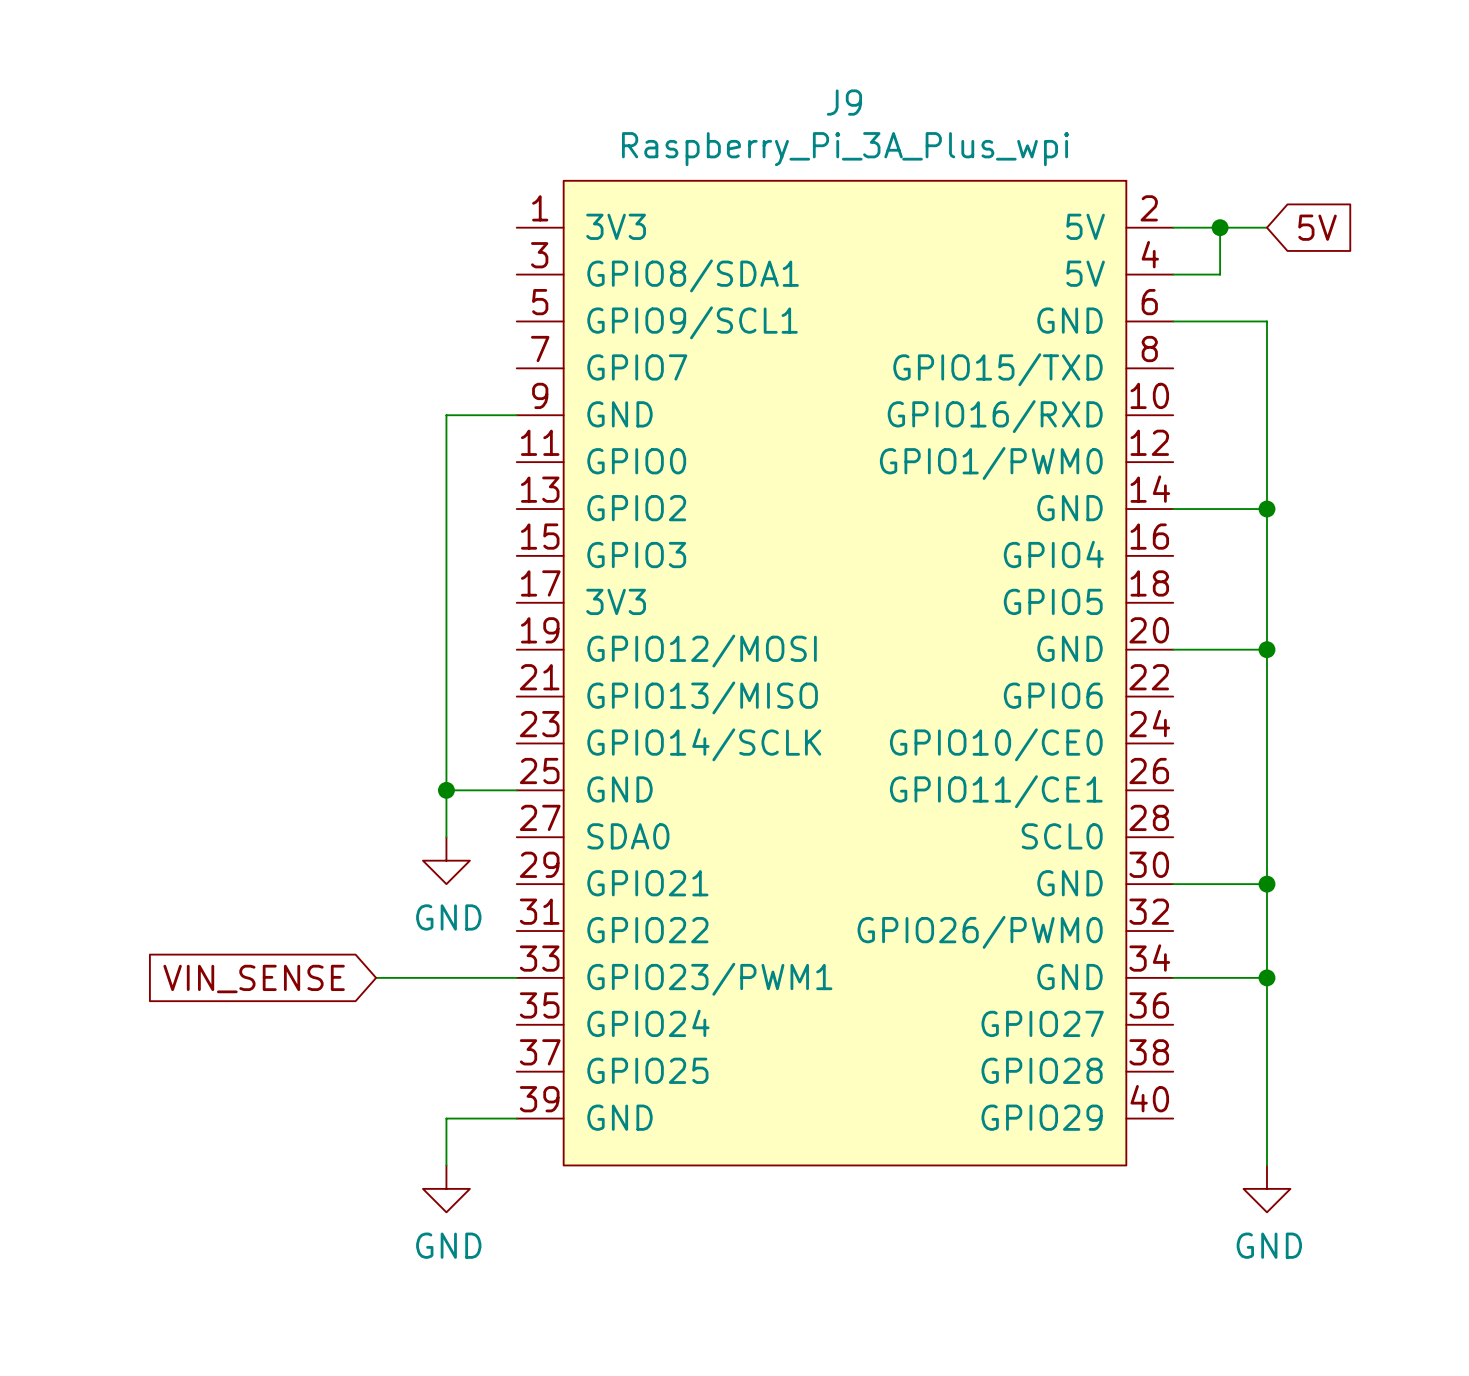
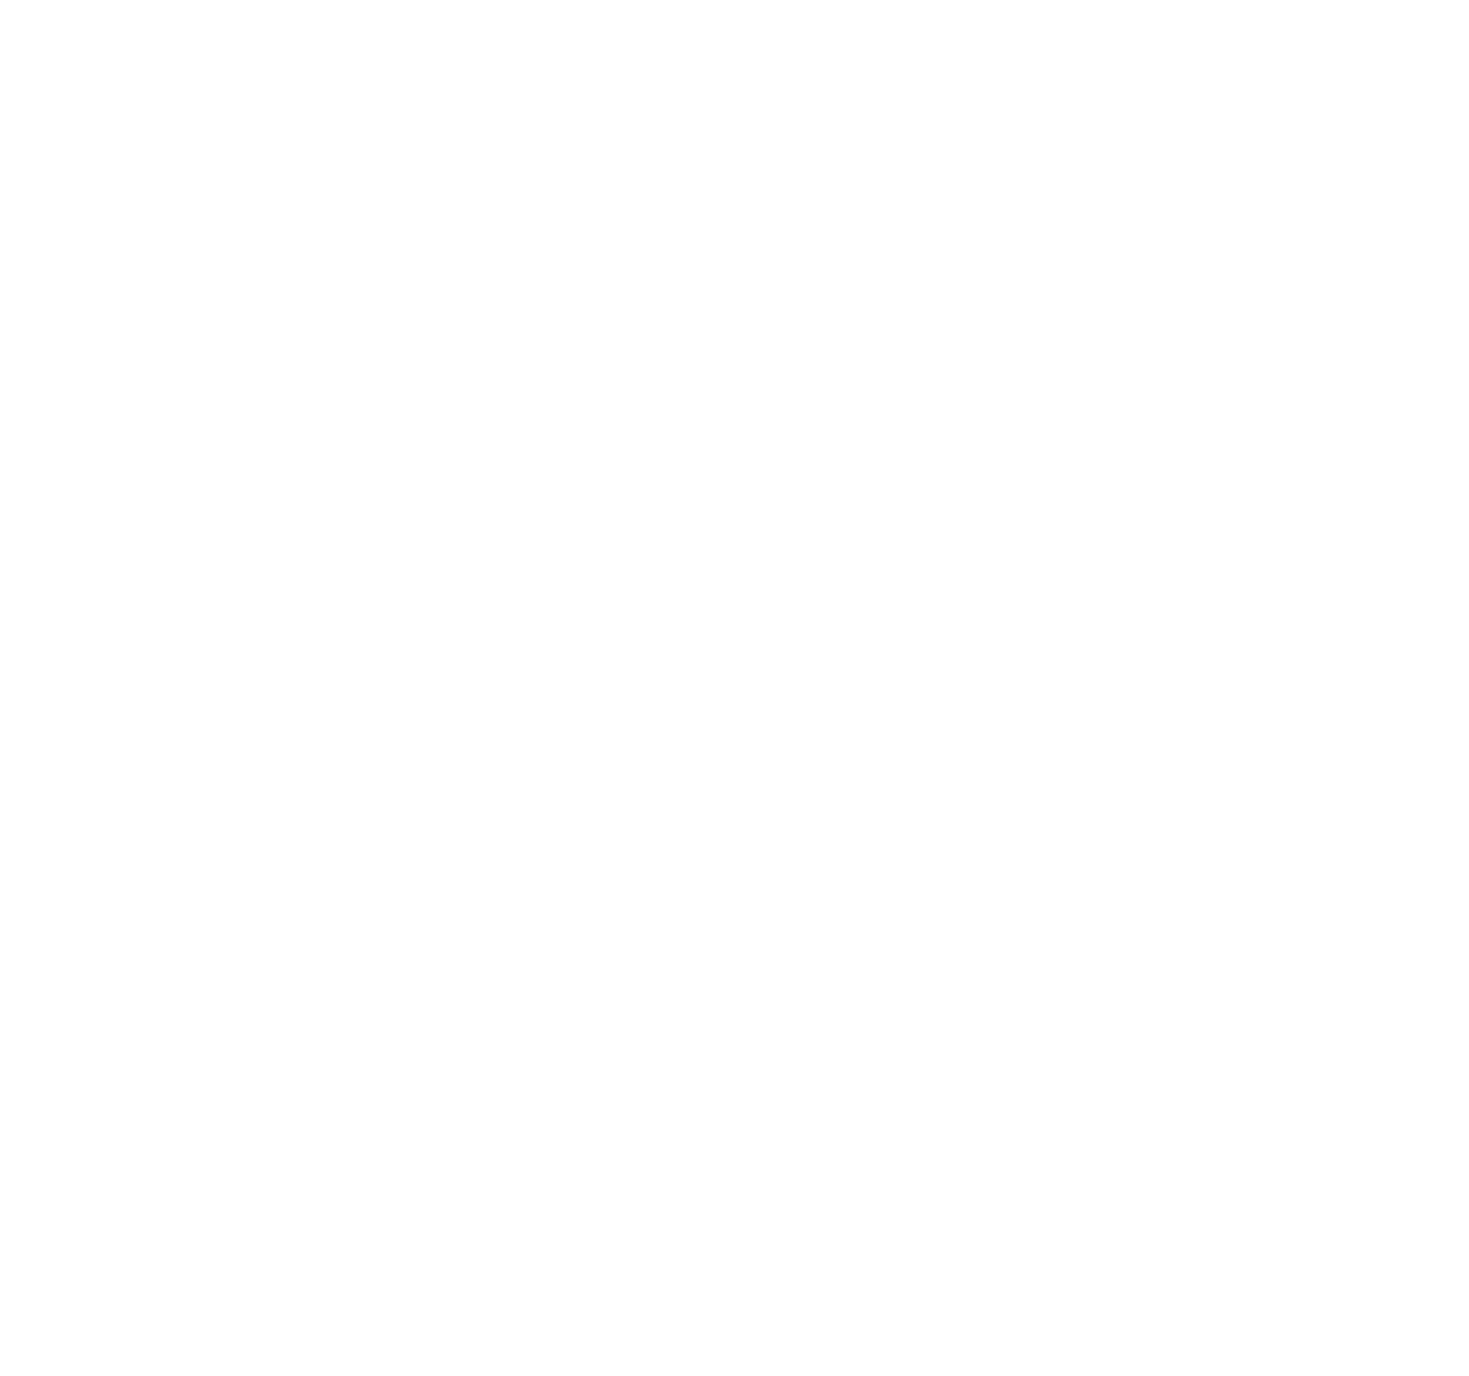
wire: (1173, 227) (1266, 227) -> none
wire: (1220, 227) (1220, 274) (1173, 274) -> none
junction: (1220, 227) -> none
global label: 5V (1317, 227) -> none
wire: (1173, 321) (1266, 321) (1266, 1165) -> none
wire: (516, 415) (446, 415) (446, 837) -> none
wire: (1173, 509) (1266, 509) -> none
junction: (1266, 509) -> none
wire: (1173, 649) (1266, 649) -> none
junction: (1266, 649) -> none
J9: Raspberry_Pi_3A_Plus_wpi (844, 673) -> none
wire: (446, 790) (516, 790) -> none
junction: (446, 790) -> none
power symbol: GND (446, 860) -> none
wire: (1173, 884) (1266, 884) -> none
junction: (1266, 884) -> none
wire: (376, 977) (516, 977) -> none
wire: (1173, 977) (1266, 977) -> none
junction: (1266, 977) -> none
global label: VIN_SENSE (254, 979) -> none
wire: (516, 1118) (446, 1118) (446, 1165) -> none
power symbol: GND (446, 1188) -> none
power symbol: GND (1266, 1188) -> none

